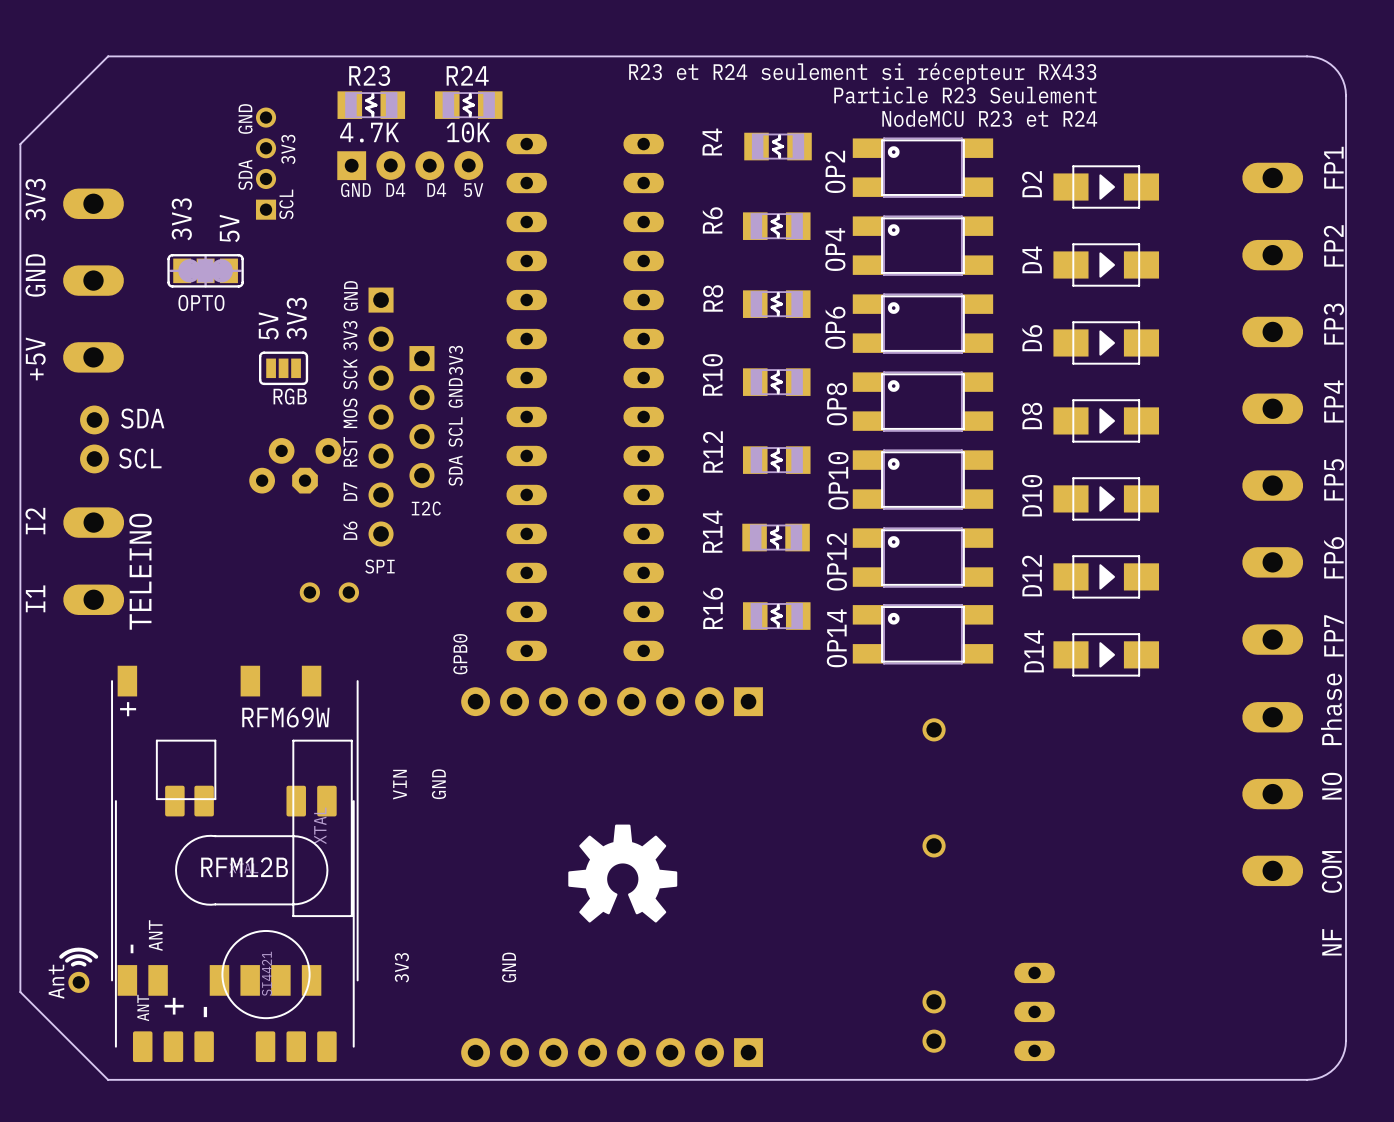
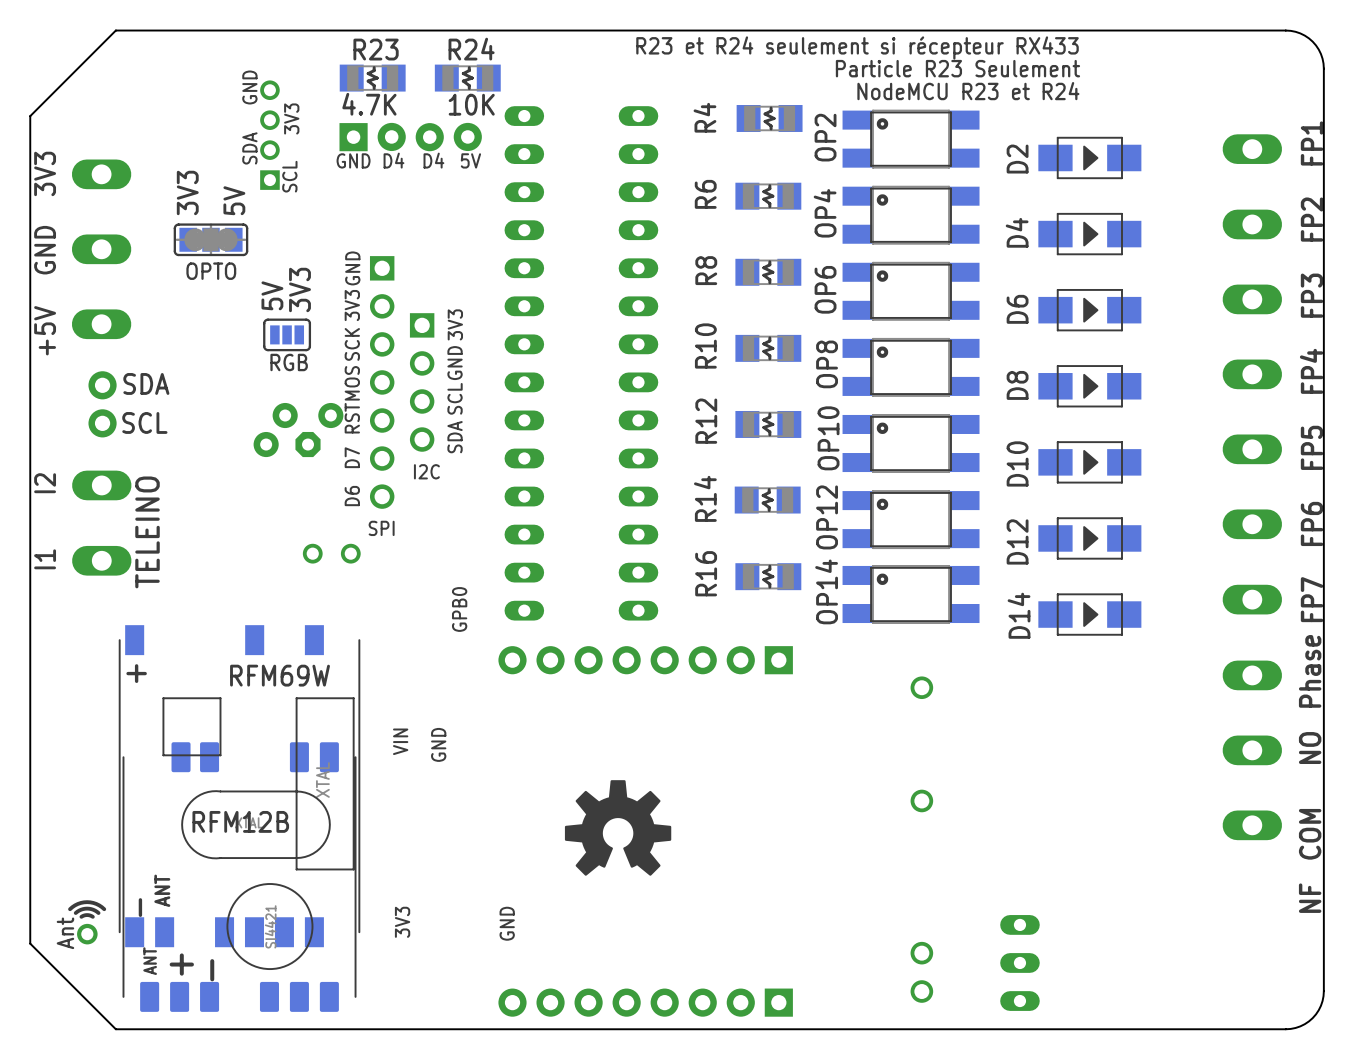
part position: (612, 701) -> (645, 660)
part position: (612, 1052) -> (645, 1002)

